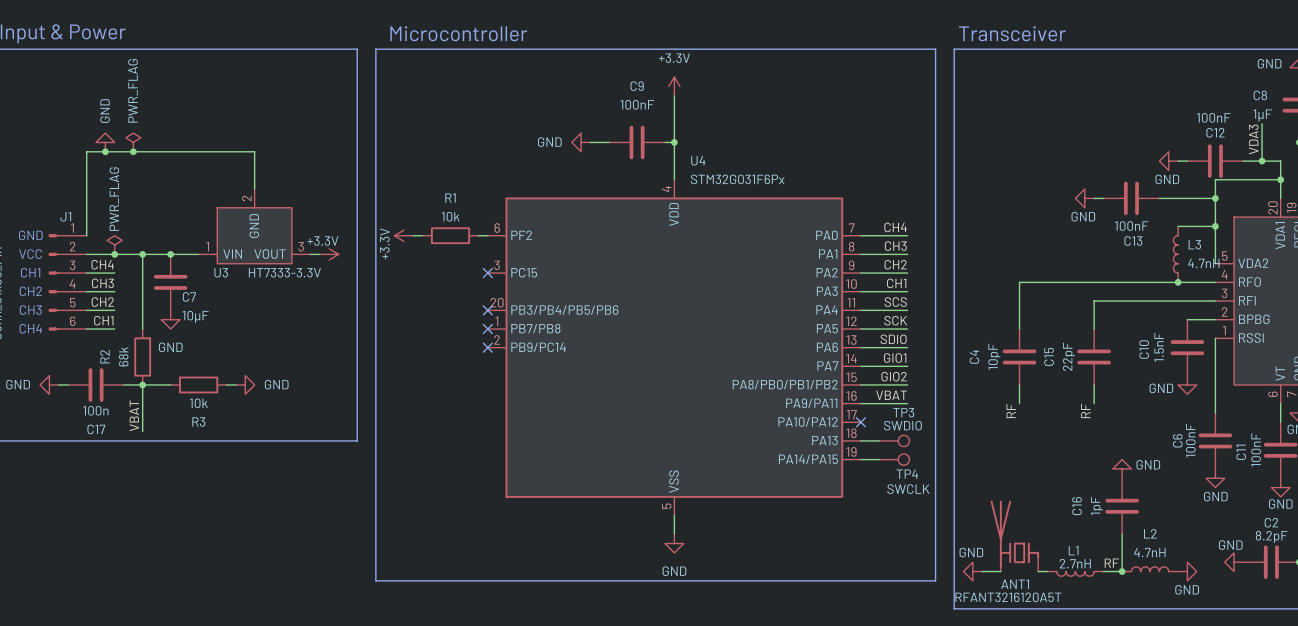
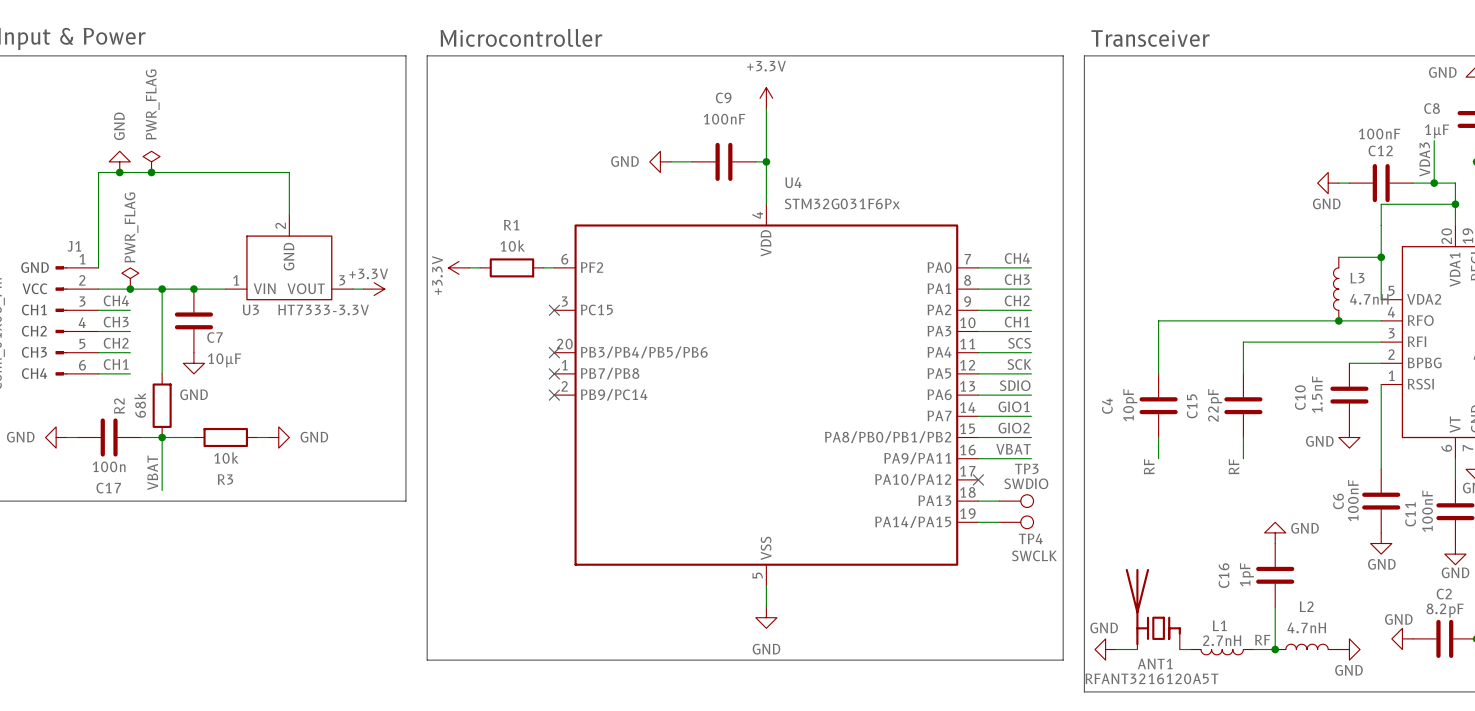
power symbol: GND (1084, 198) -> none
wire: (1094, 198) (1103, 198) -> none
C13: 100nF (1131, 198) -> none
wire: (1159, 198) (1215, 198) -> none
junction: (1215, 198) -> none

